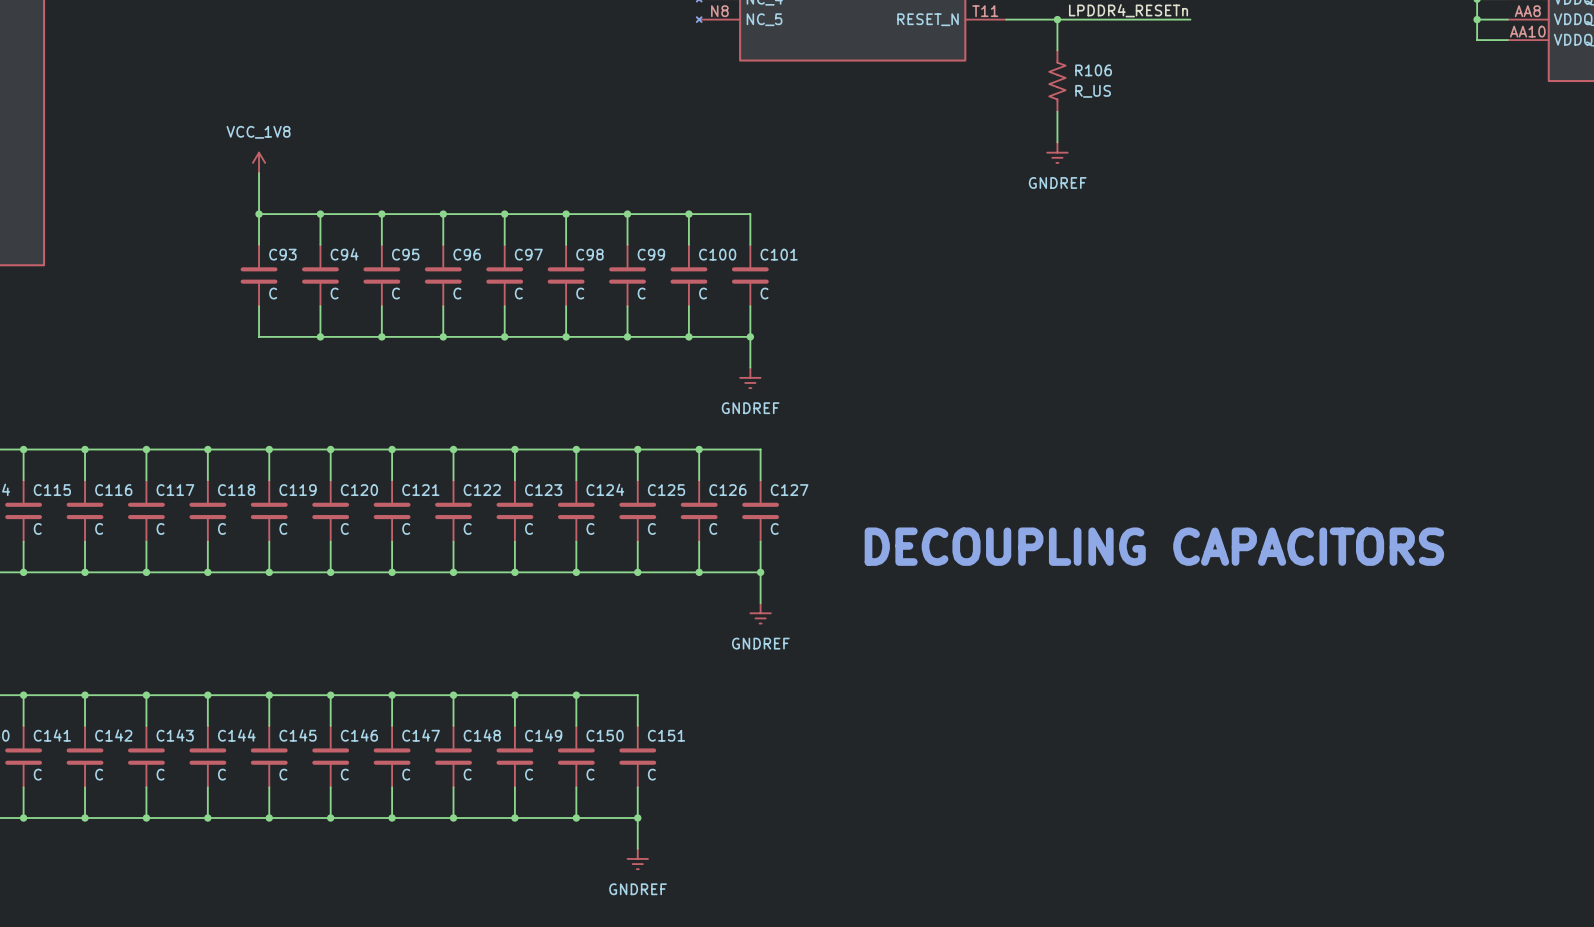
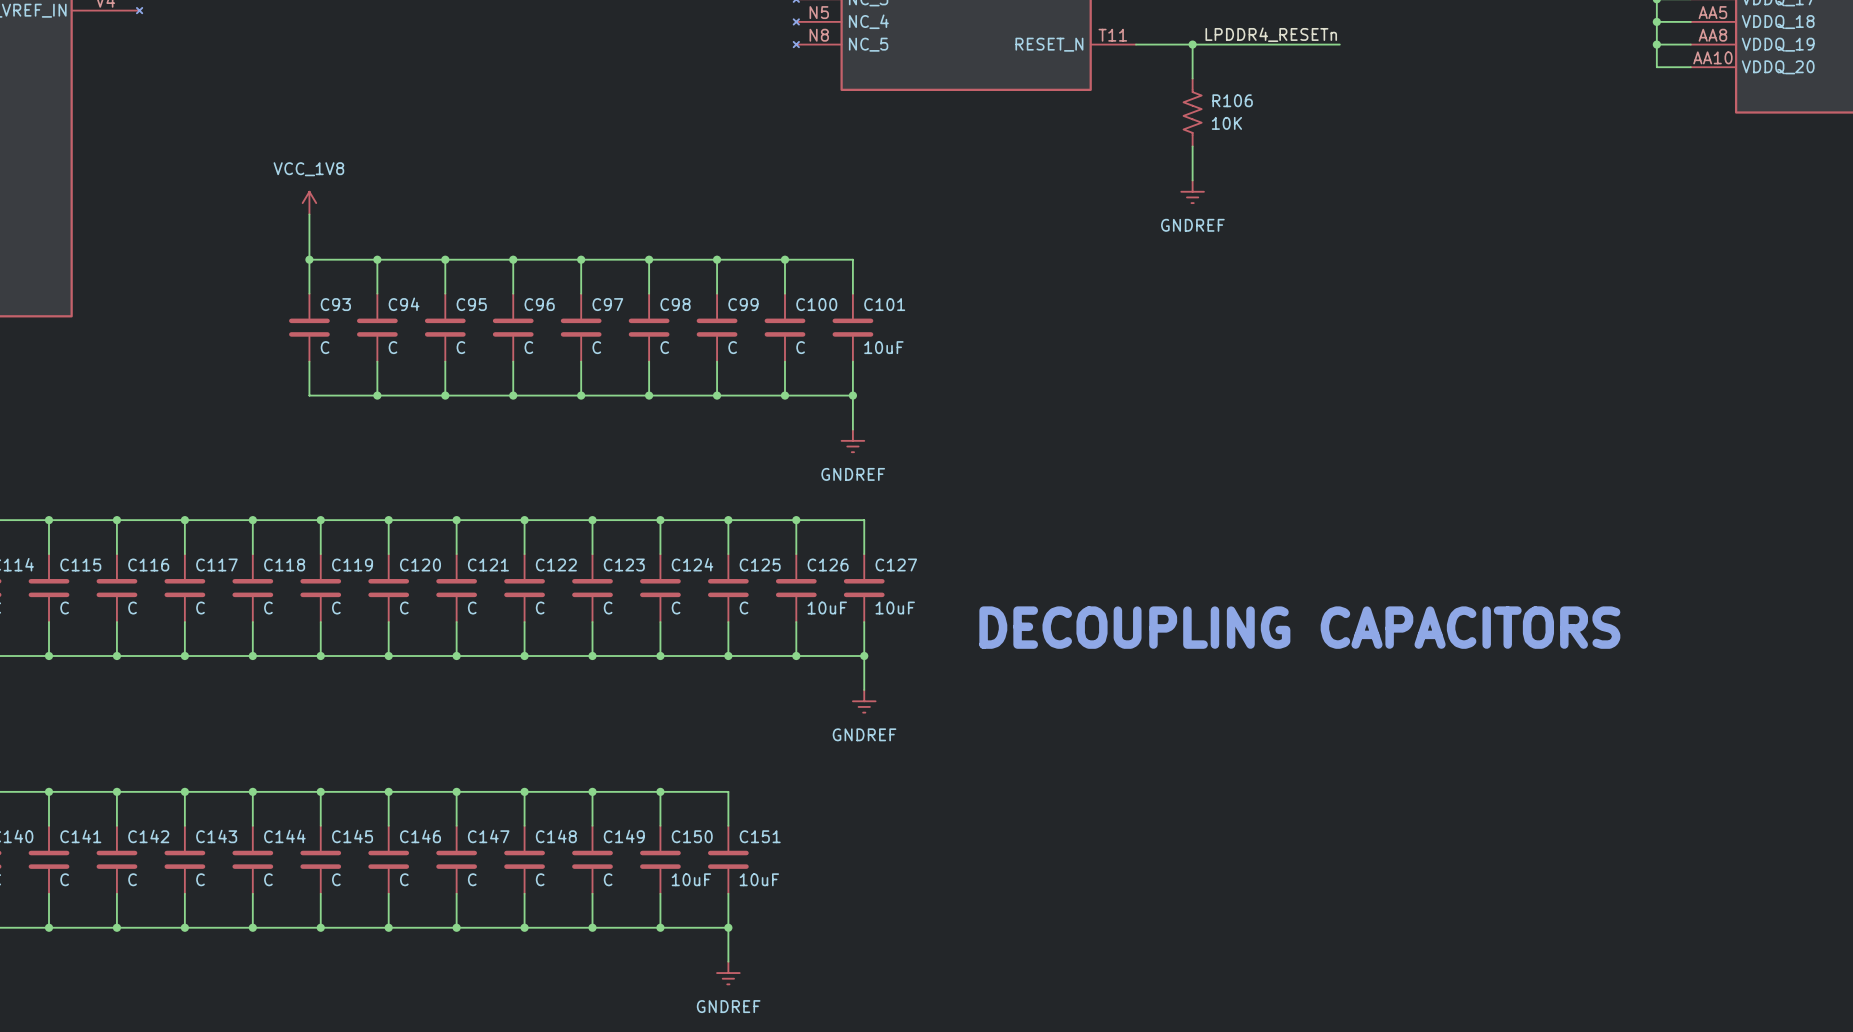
R106 value: R_US (1093, 91) -> 10K (1226, 123)
C101 value: C (764, 293) -> 10uF (883, 347)
C126 value: C (713, 528) -> 10uF (827, 608)
C127 value: C (774, 528) -> 10uF (895, 608)
C150 value: C (590, 774) -> 10uF (691, 879)
C151 value: C (651, 774) -> 10uF (759, 879)

